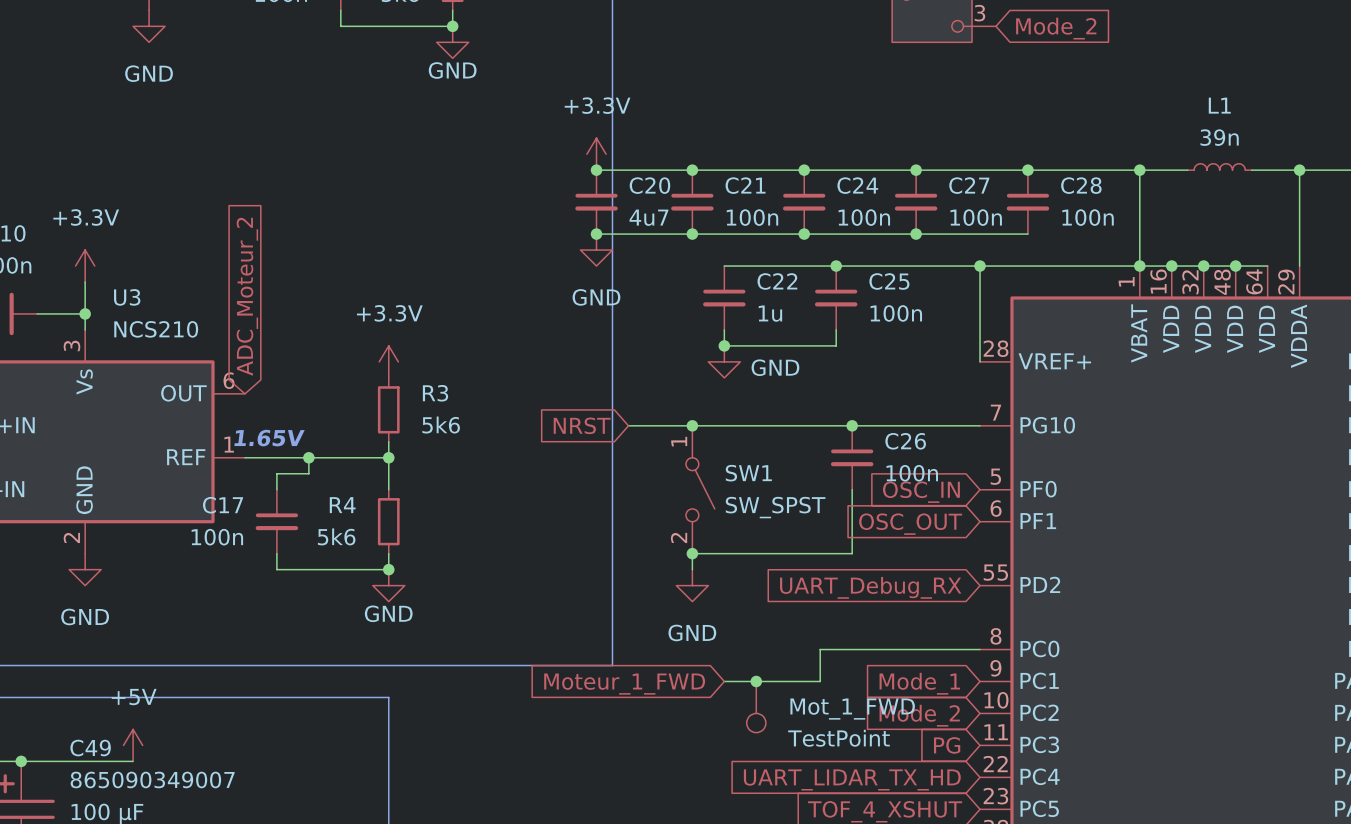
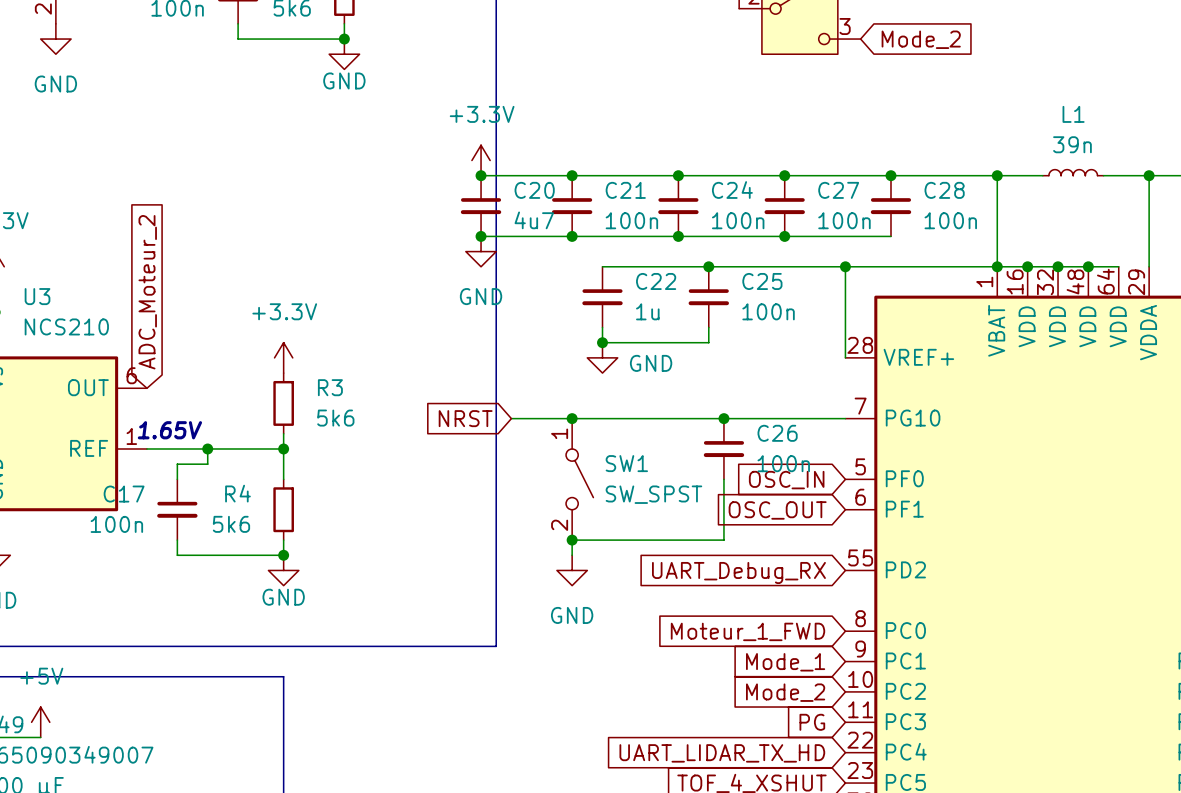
wire: (980, 649) (820, 649) (820, 681) (724, 681) -> none
junction: (756, 681) -> none
global label position: Moteur_1_FWD (624, 684) -> Moteur_1_FWD (747, 631)
Mot_1_FWD: TestPoint (756, 707) -> none

